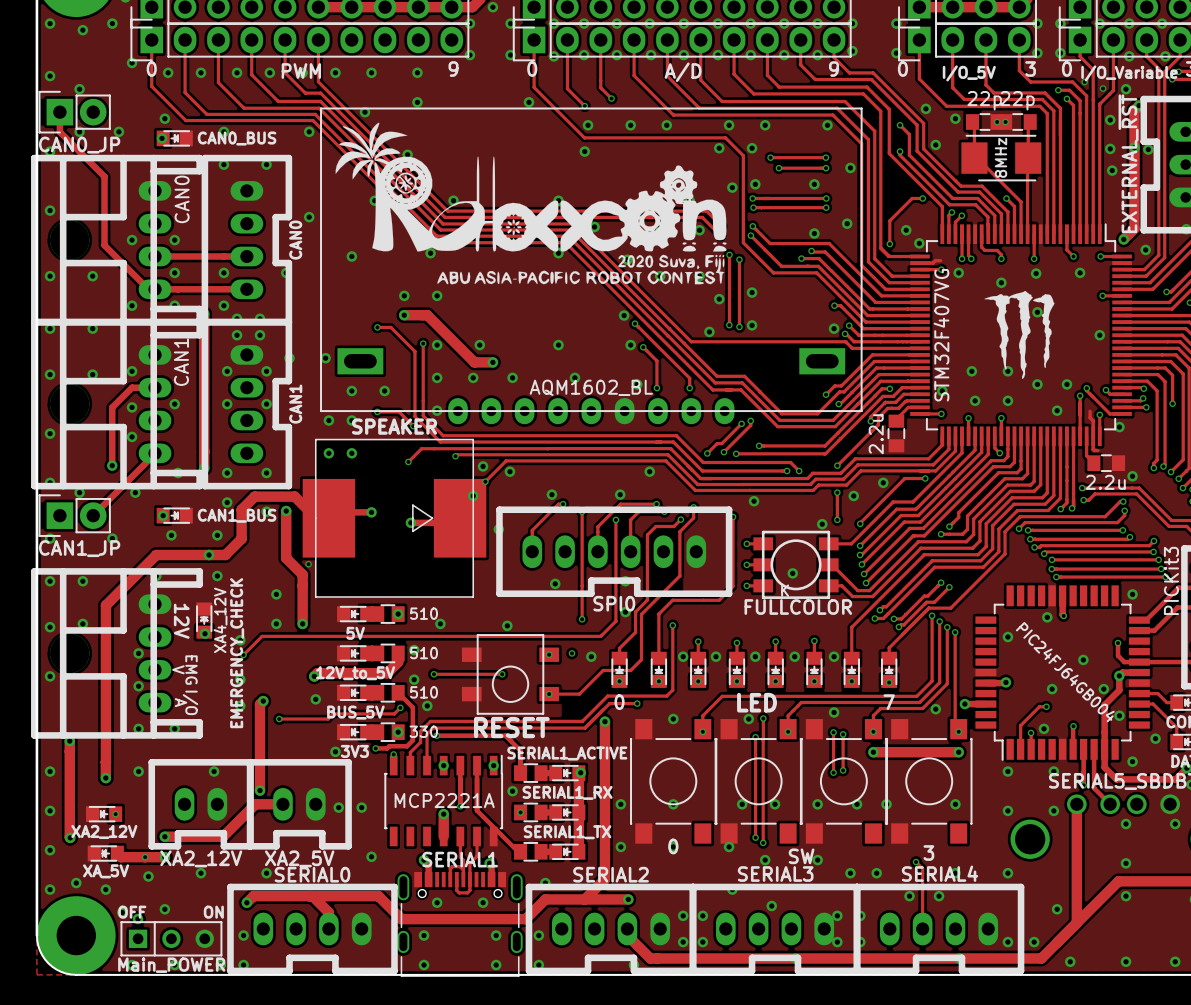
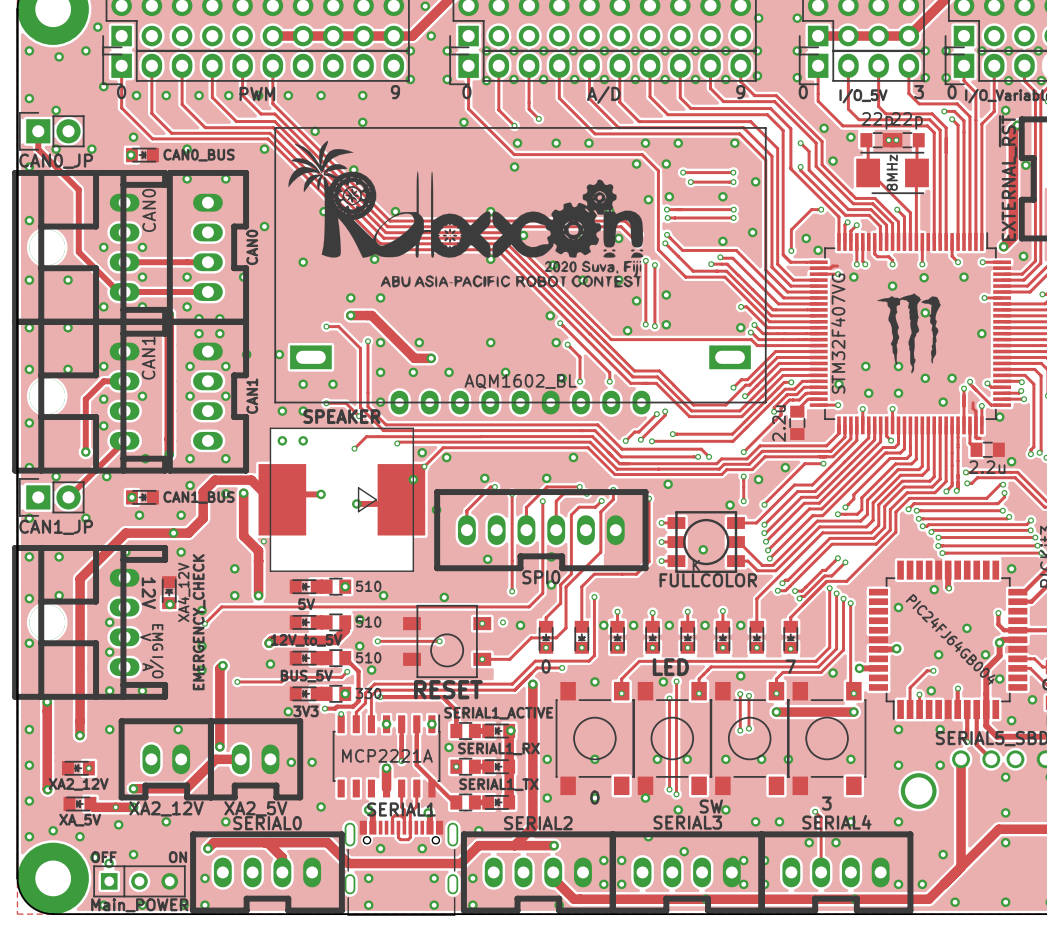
via: (1084, 81) -> none
via: (1103, 88) -> none
via: (1110, 120) -> none
via: (1134, 147) -> none
via: (1110, 148) -> none
via: (1112, 170) -> none

